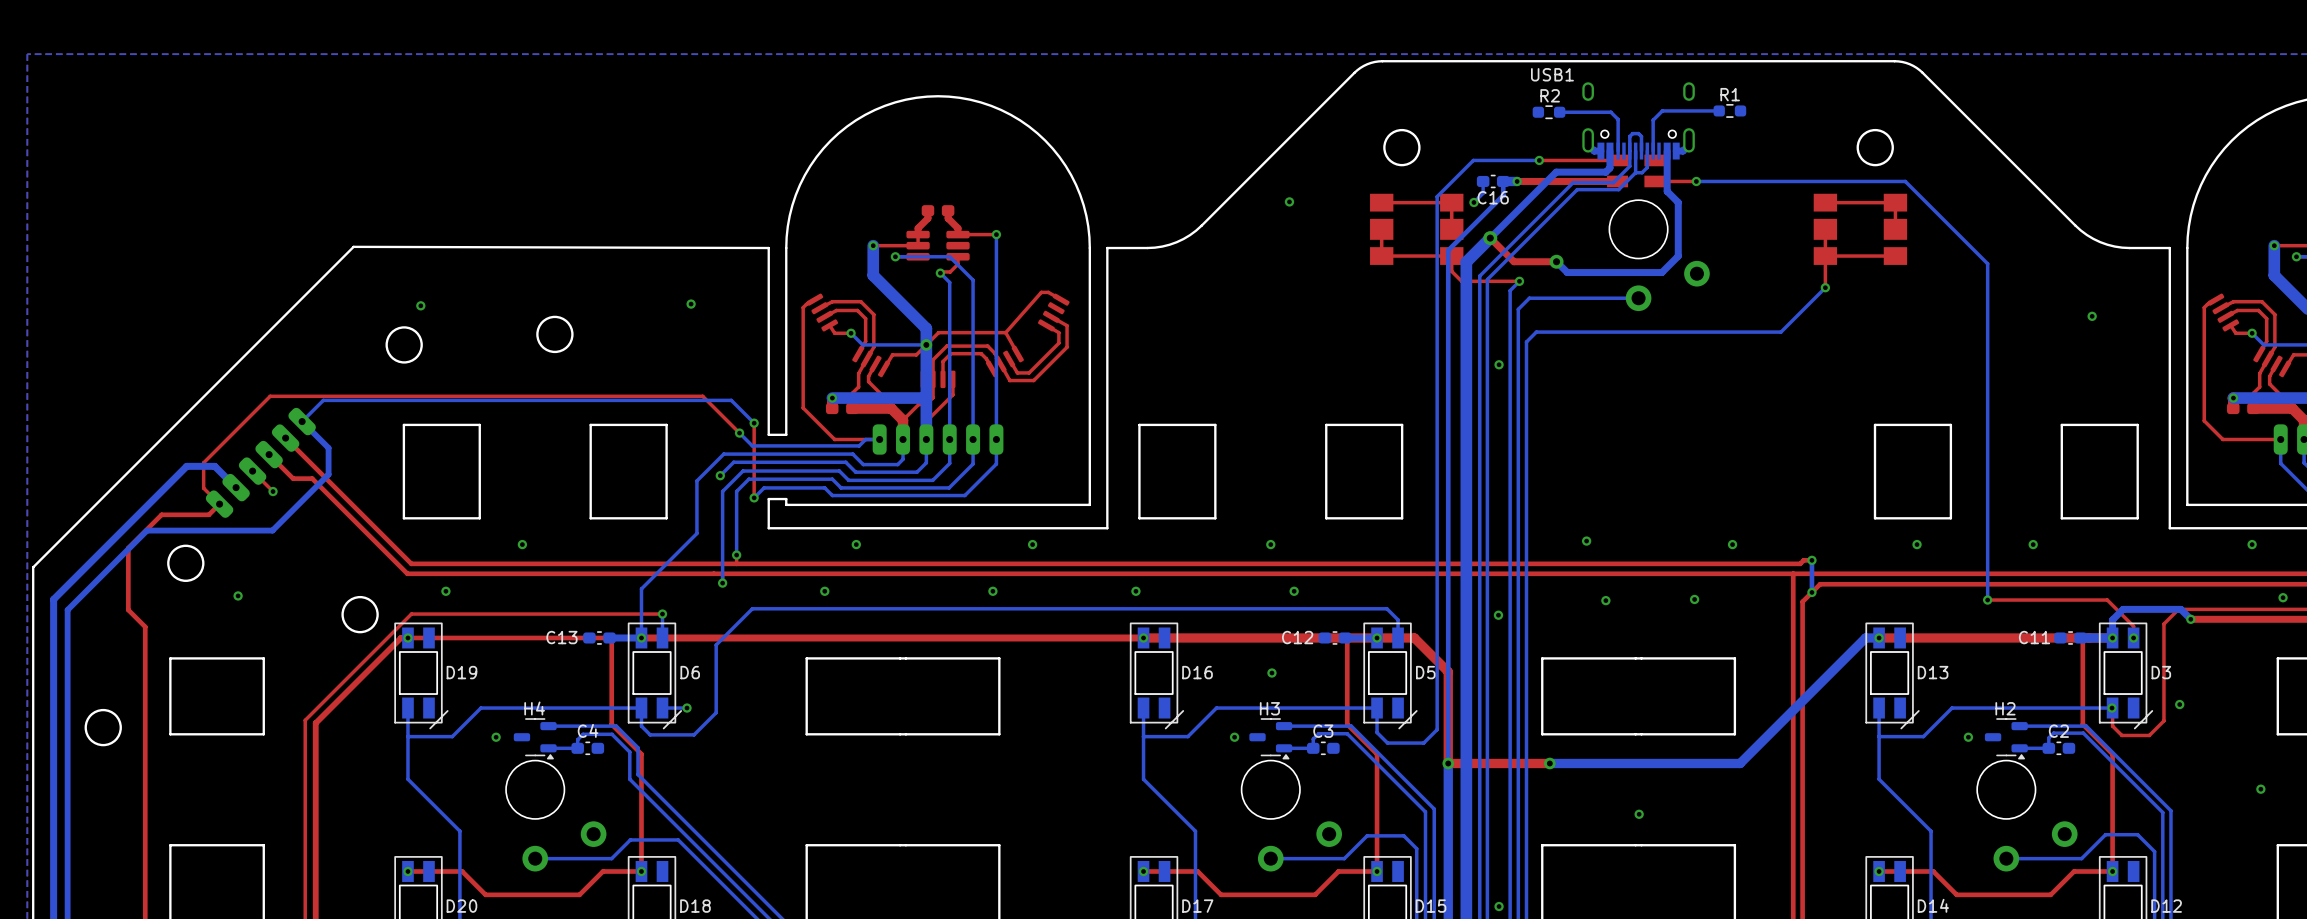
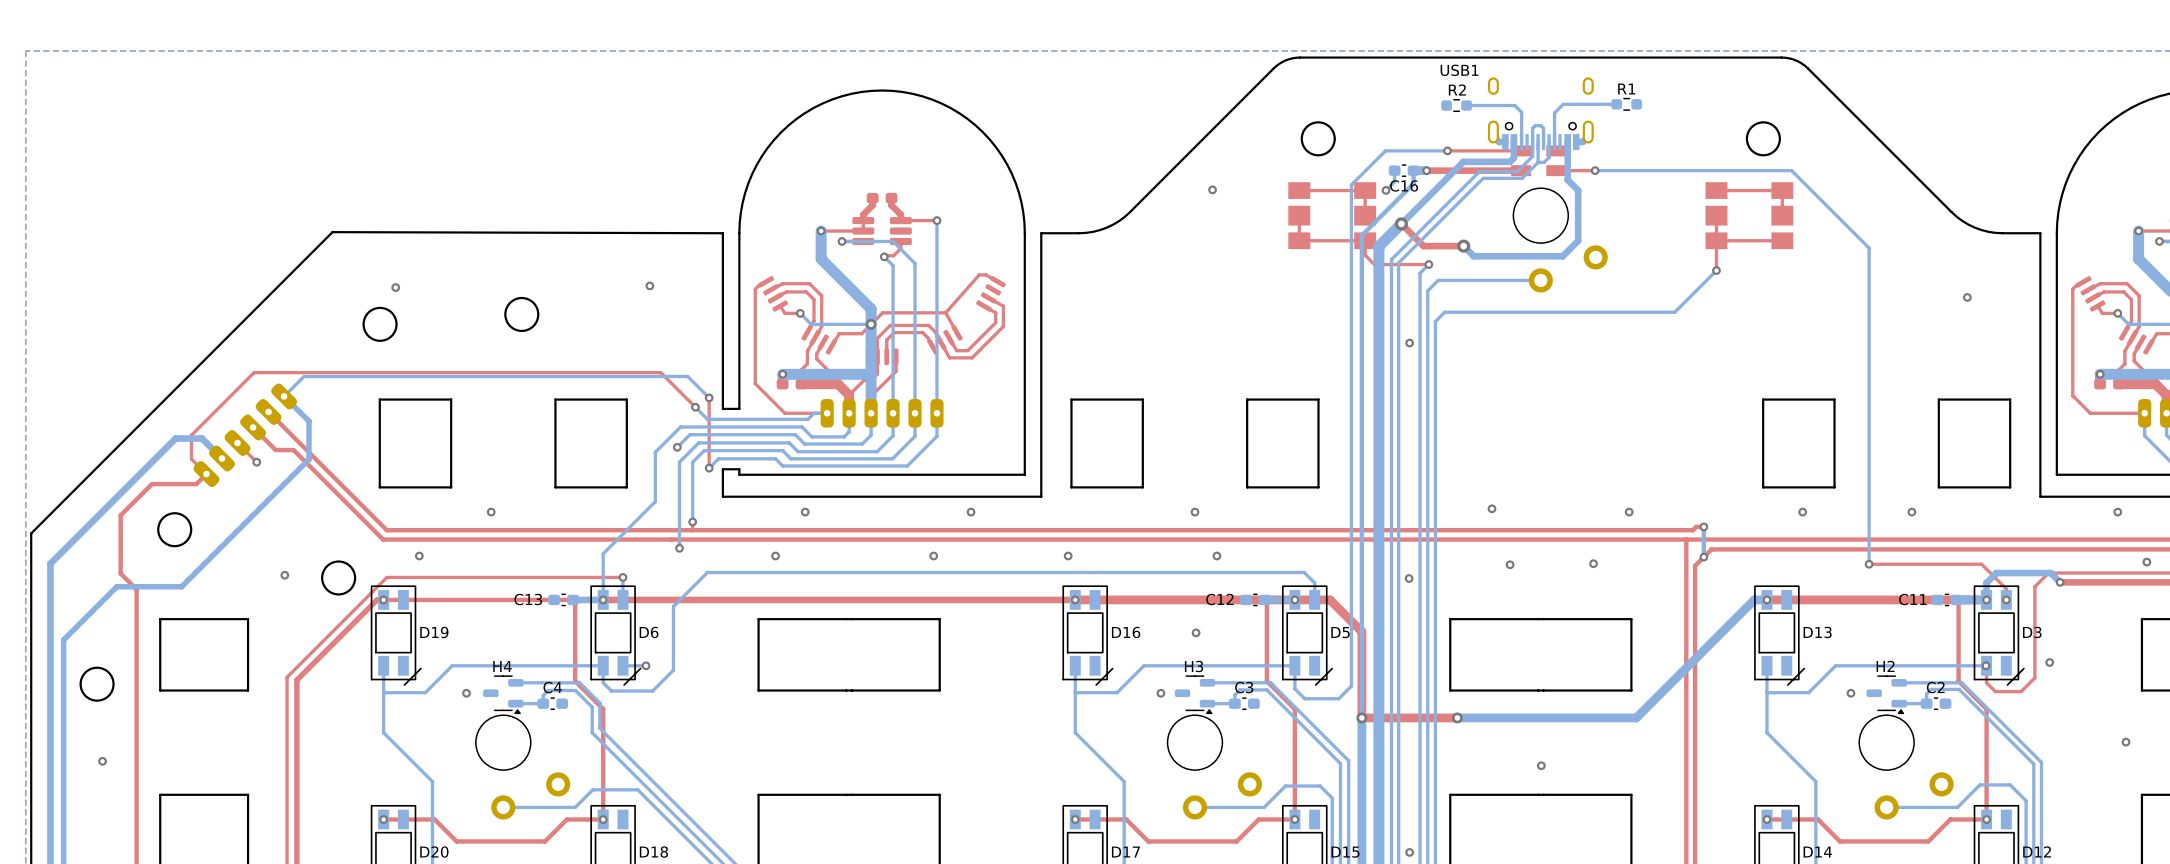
bottom track: (328, 474) (272, 530) (147, 530) (67, 609) (67, 680) -> (308, 446) (308, 459) (181, 586) (116, 586) (63, 640)
via position: (238, 595) -> (284, 575)
via: none -> (102, 761)

